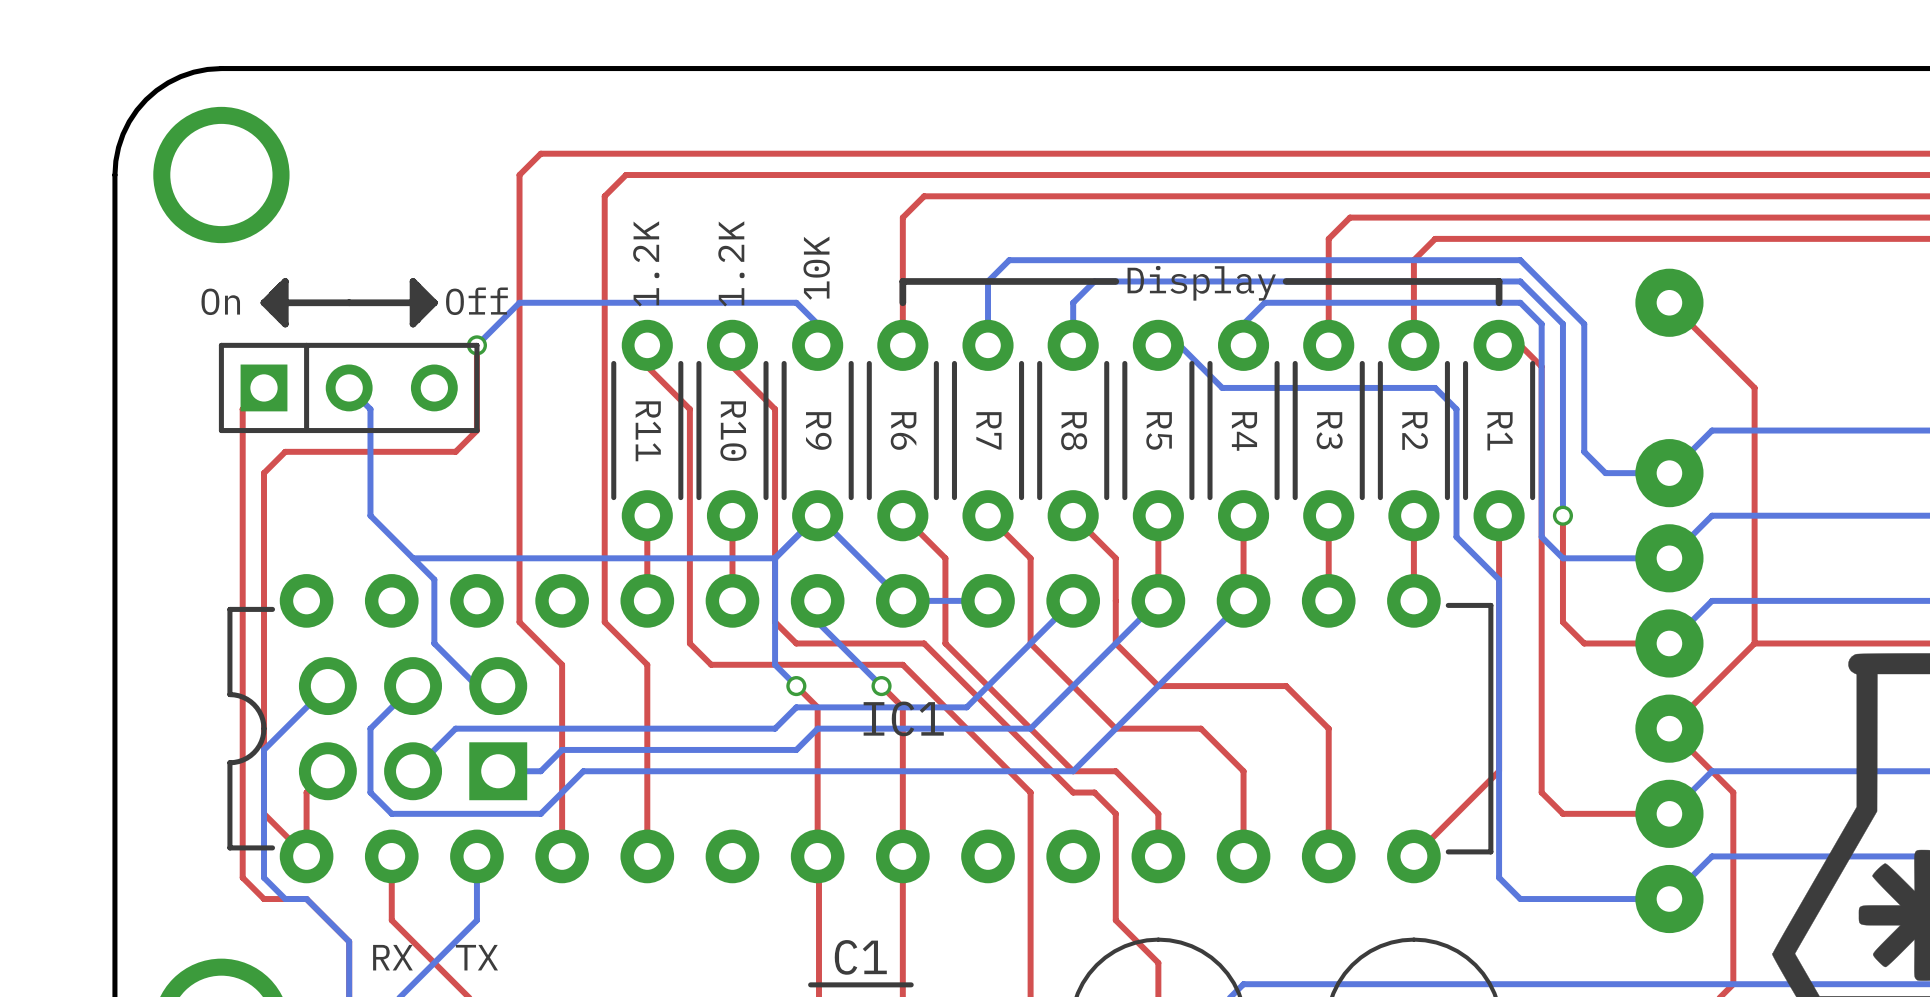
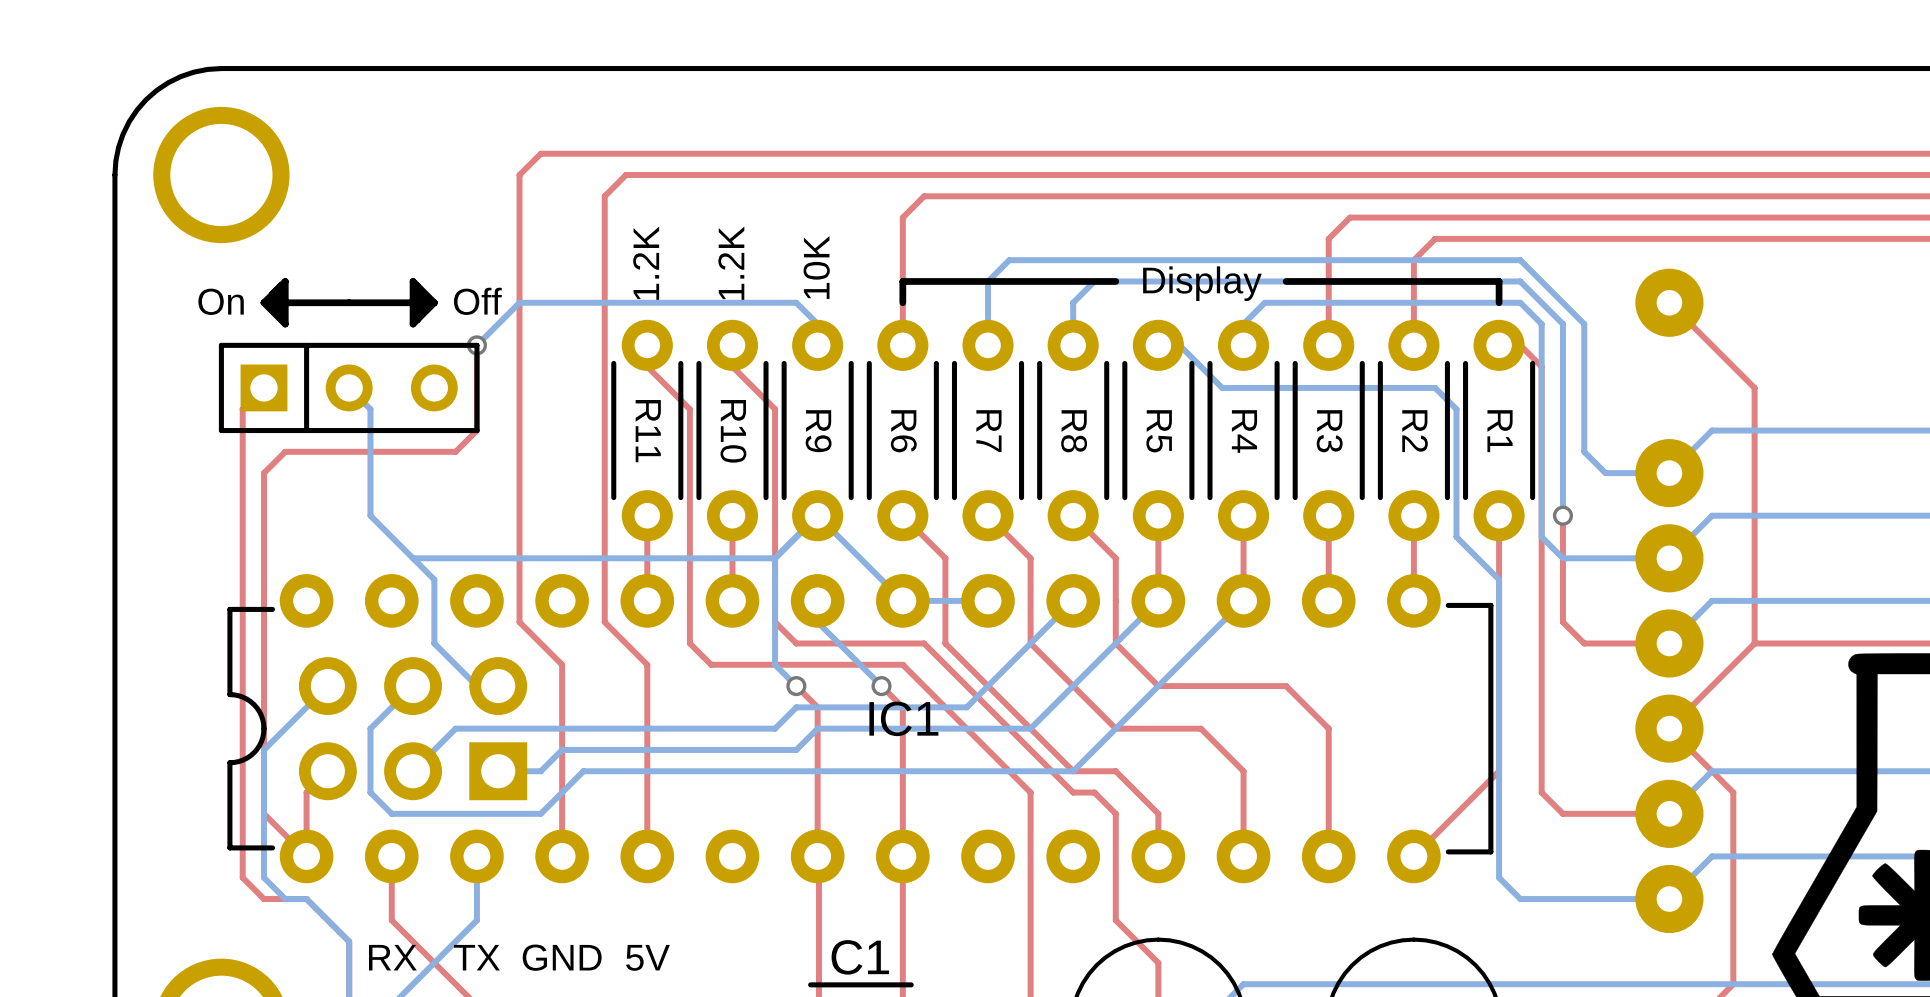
text: none -> GND (562, 957)
text: none -> 5V (647, 957)

